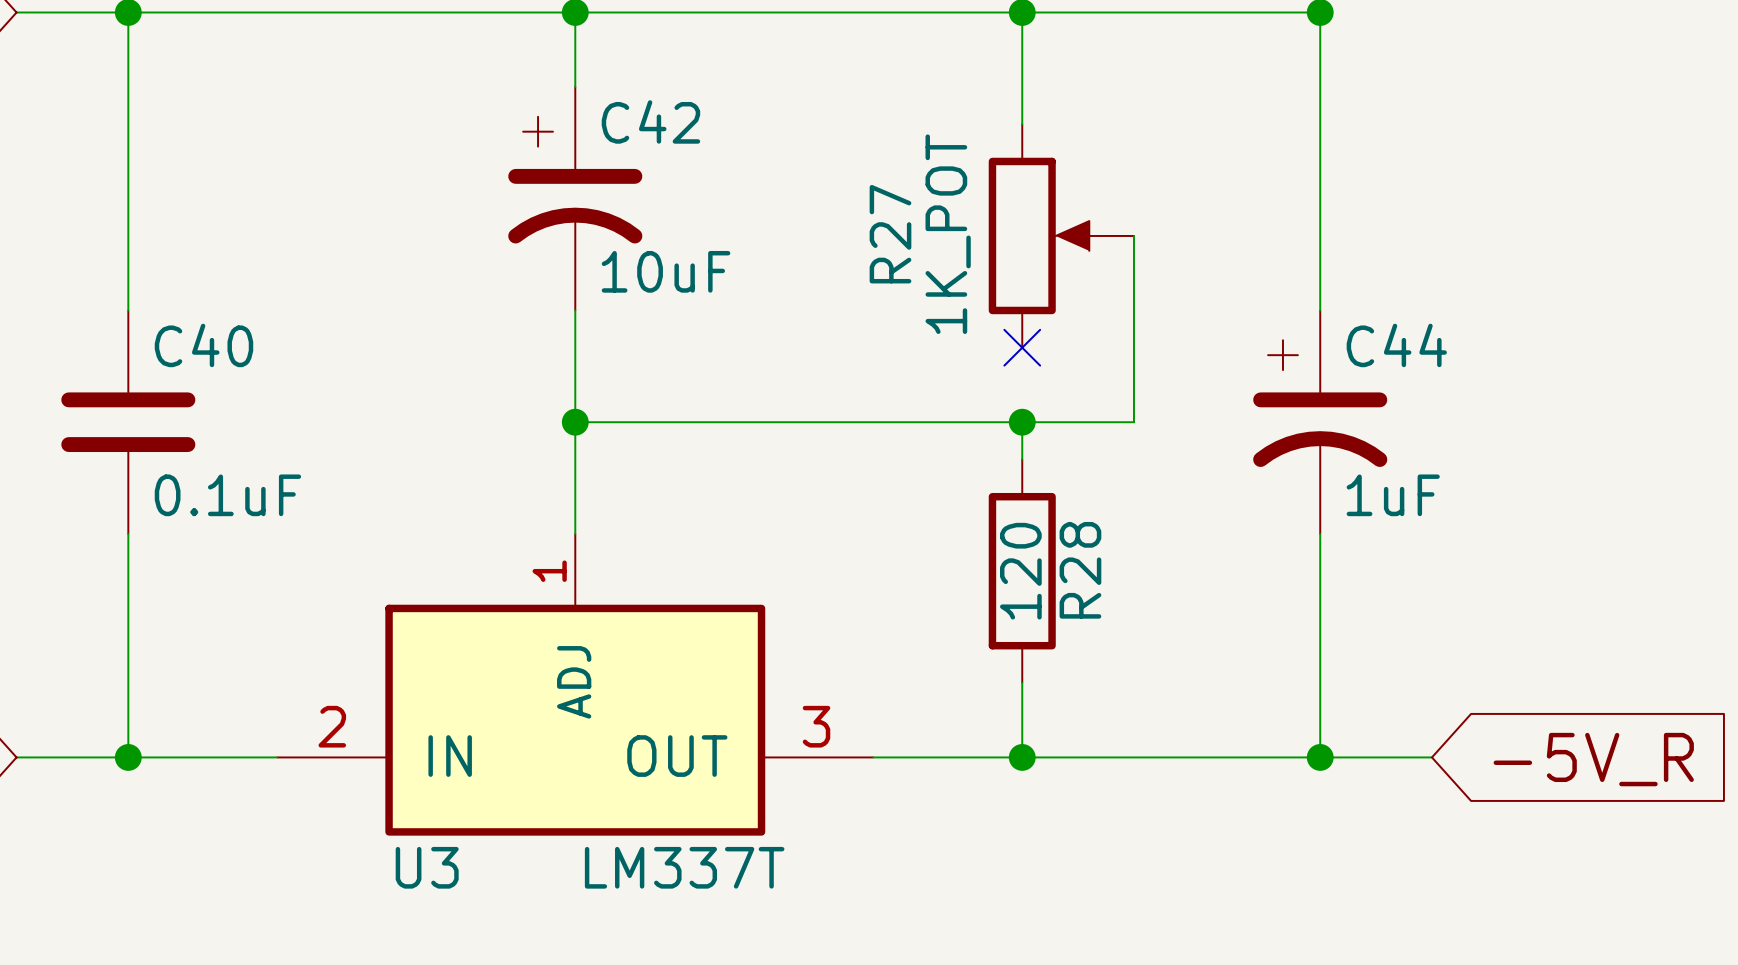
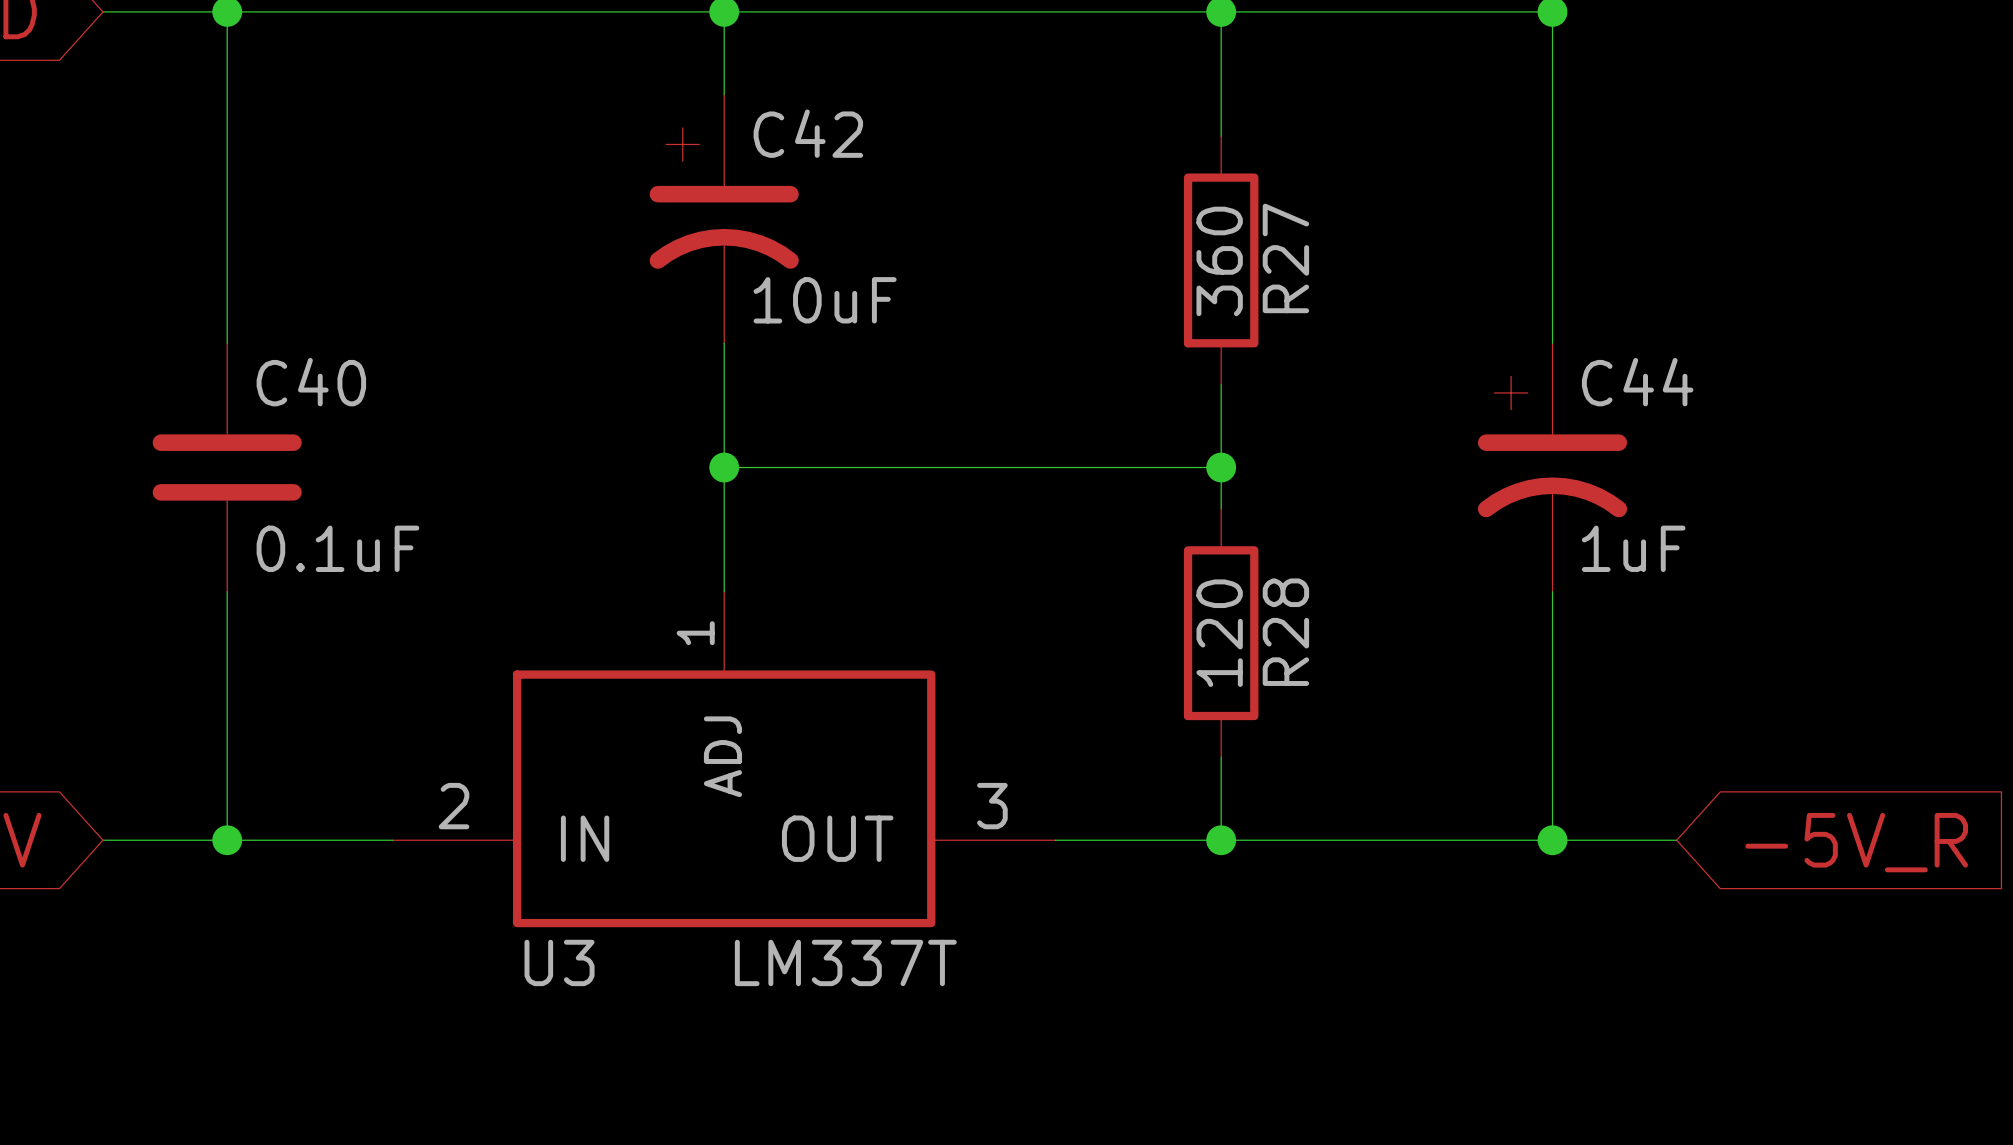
R27 symbol: [988, 124, 1134, 348] -> [1183, 136, 1259, 385]
R27 name position: R27 (890, 234) -> R27 (1285, 258)
R27 value: 1K_POT (948, 234) -> 360 (1219, 261)
wire: (1133, 235) (1133, 422) (1022, 422) -> (1221, 384) (1221, 467)
no-connect mark: (1022, 347) -> none

